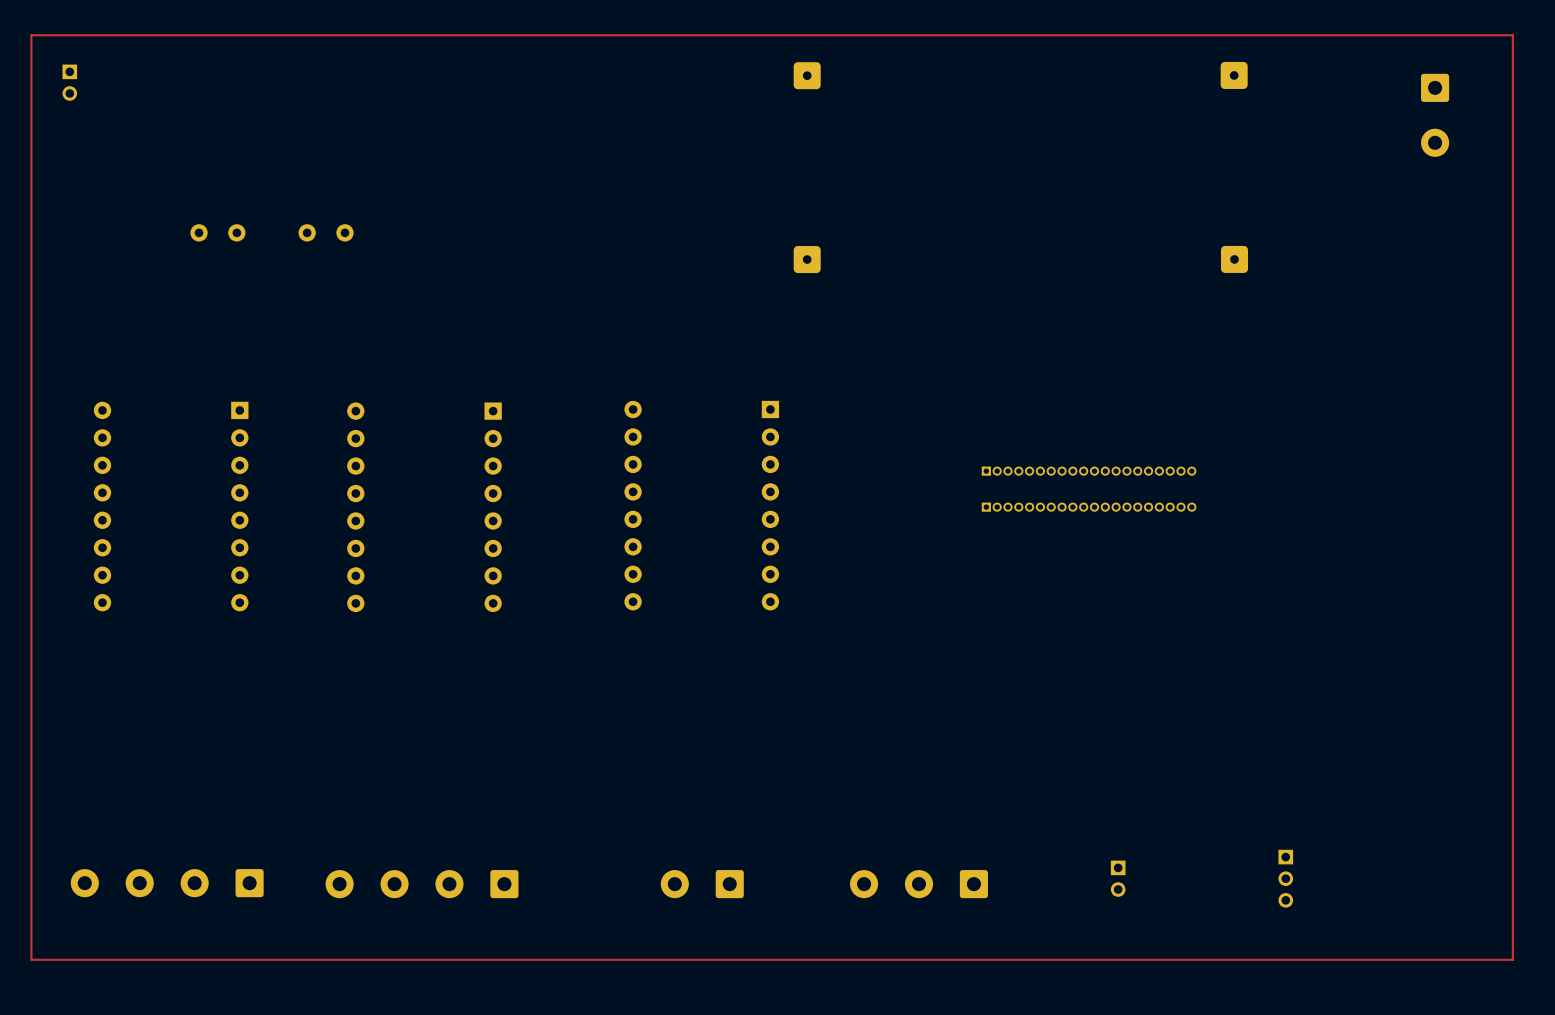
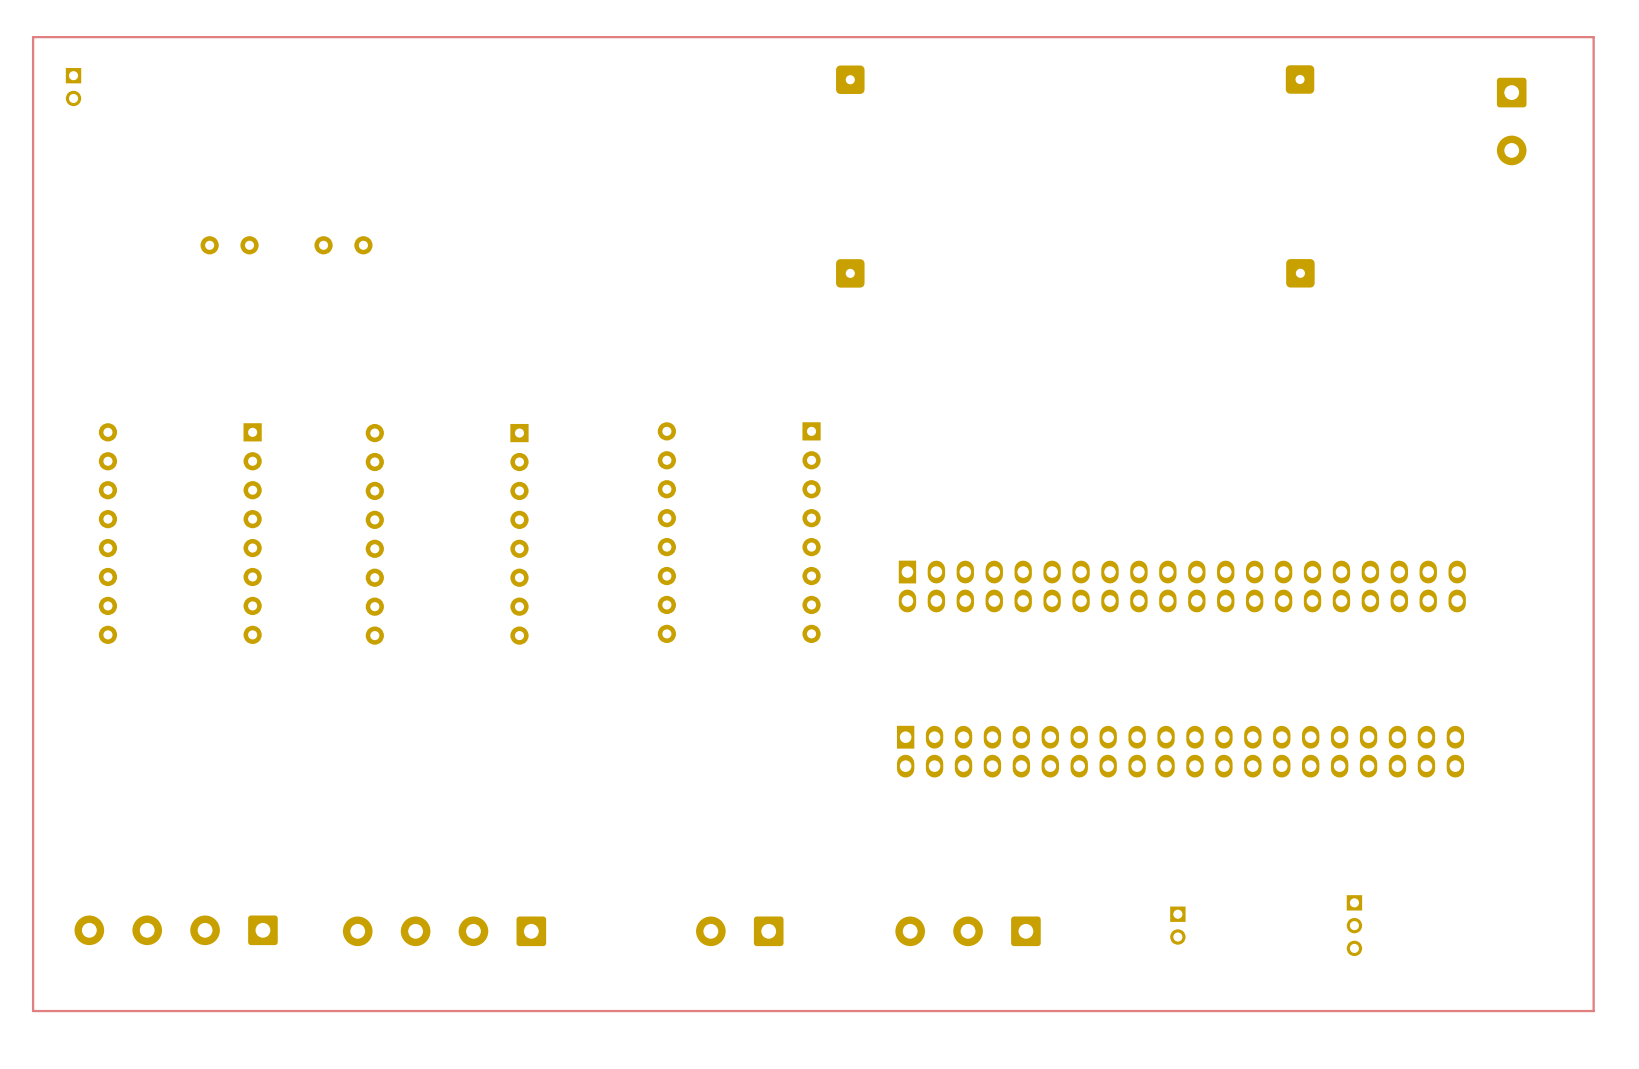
part: (1089, 471) -> none
part: (1089, 507) -> none
part: none -> (1182, 586)
part: none -> (1180, 751)

